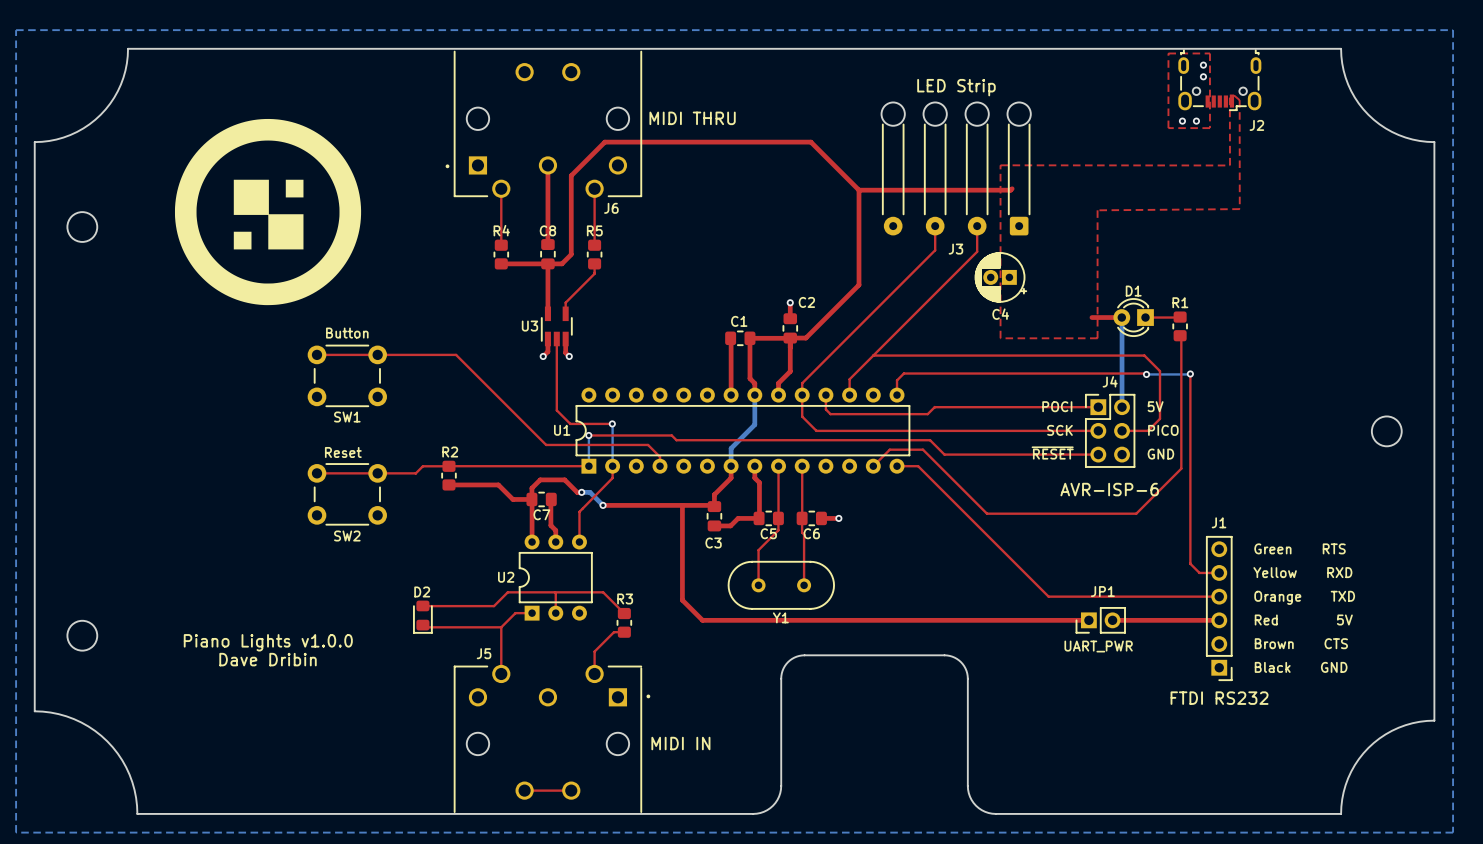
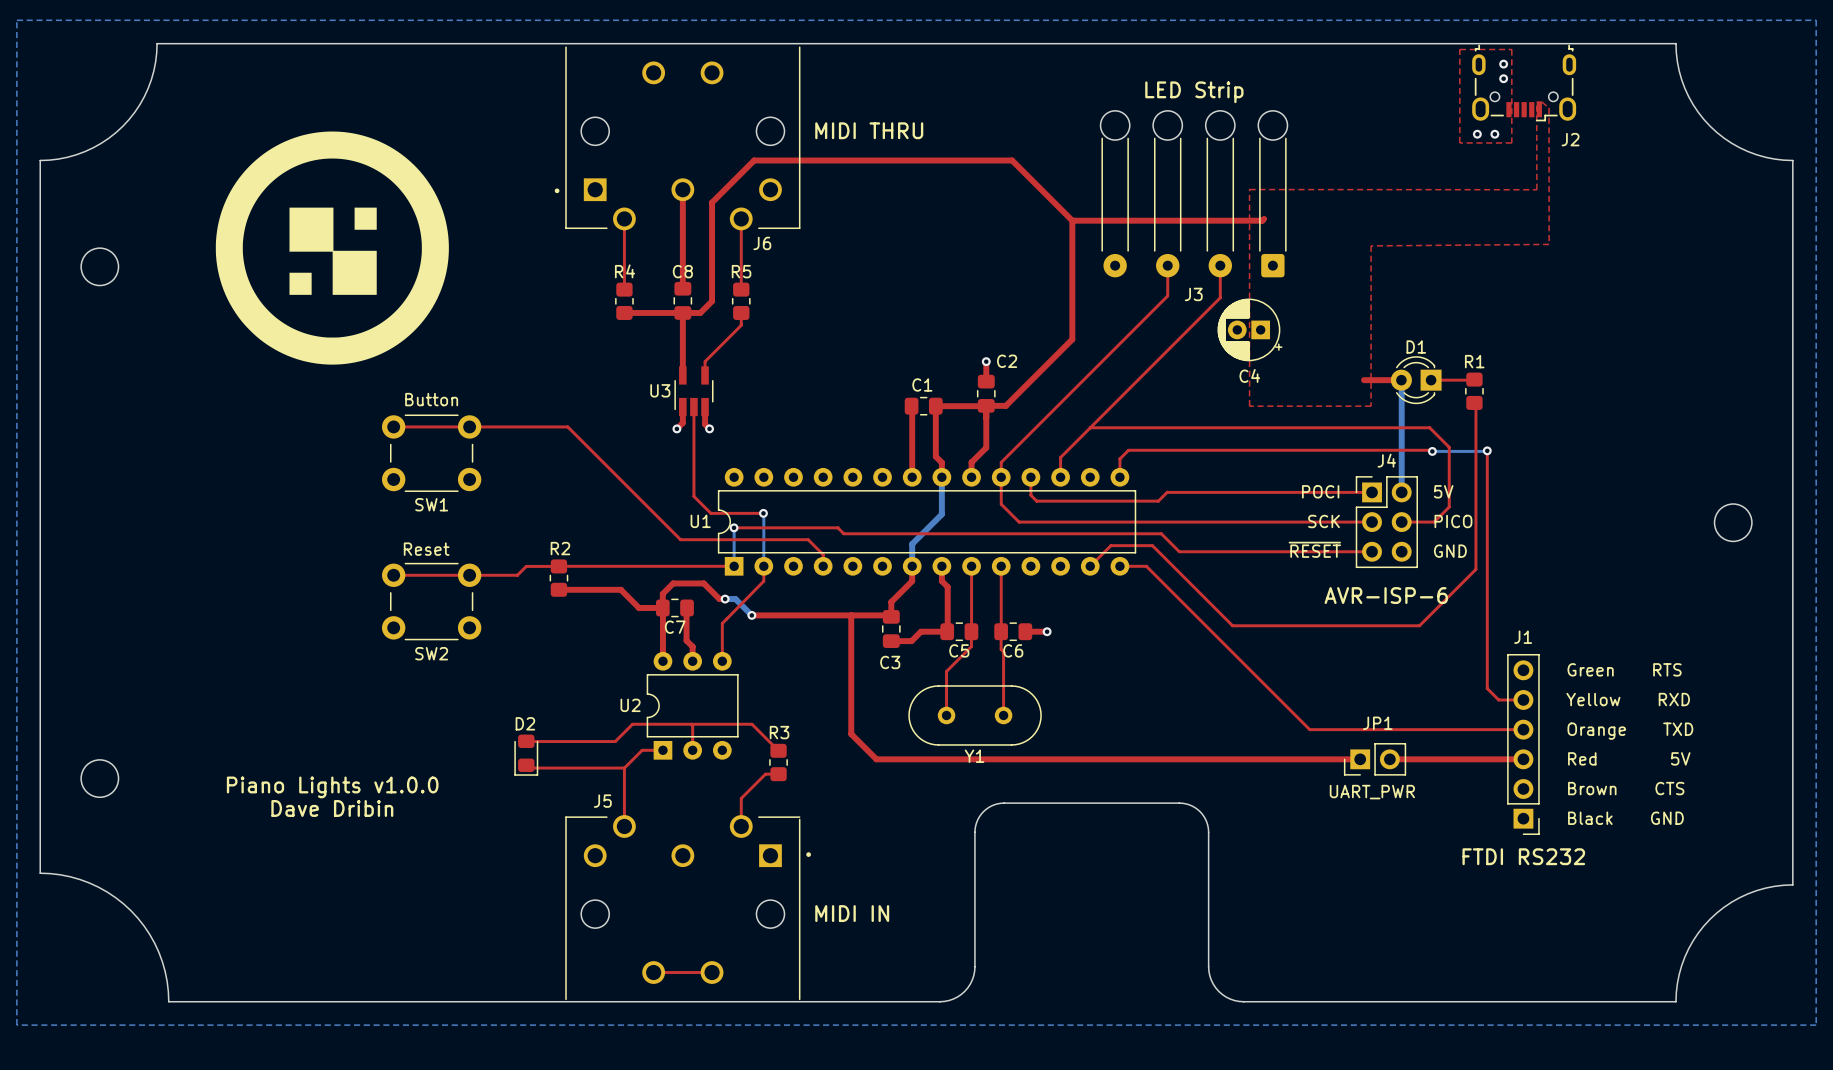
J6 value position: MIDI THRU (692, 118) -> MIDI THRU (869, 130)
J5 value position: MIDI IN (680, 743) -> MIDI IN (852, 913)

